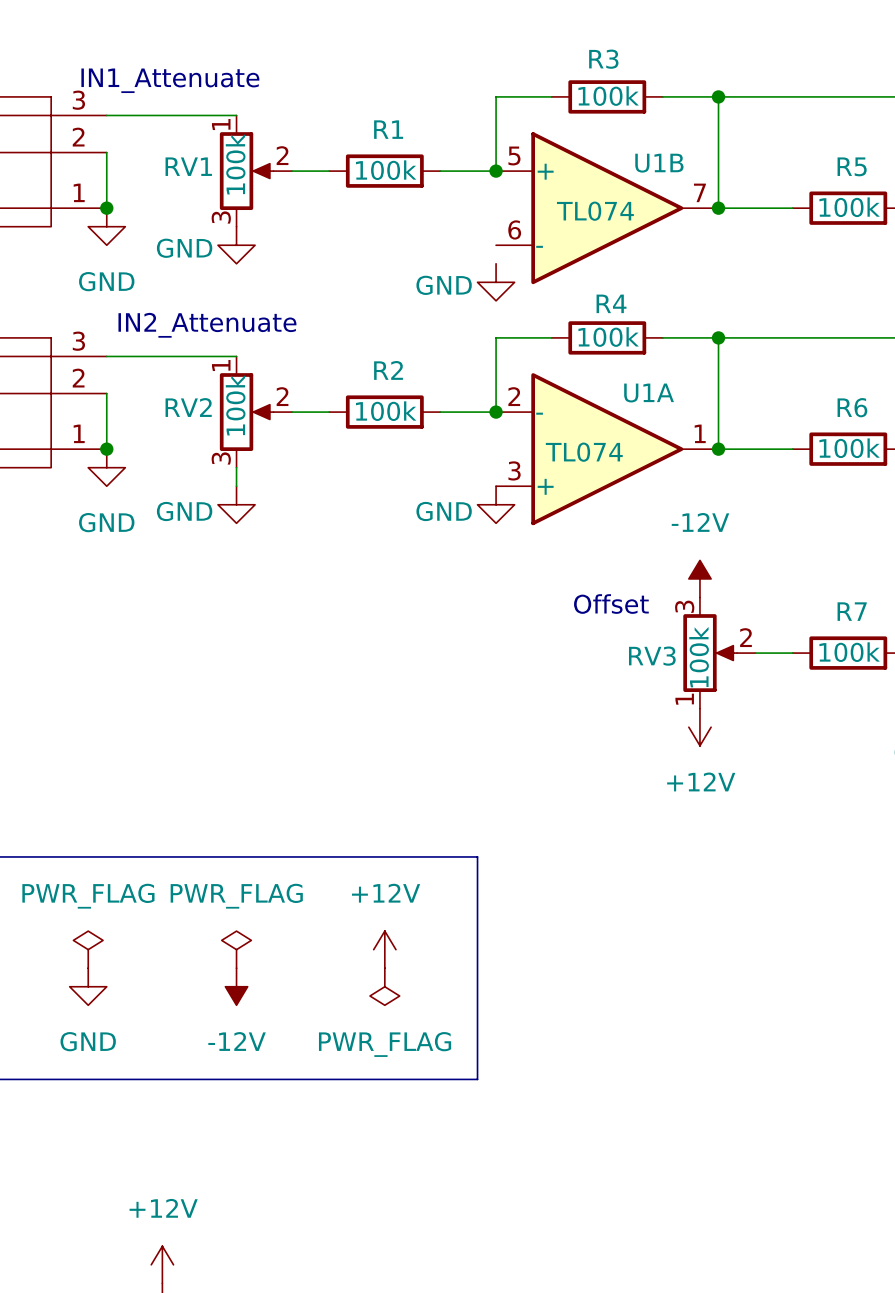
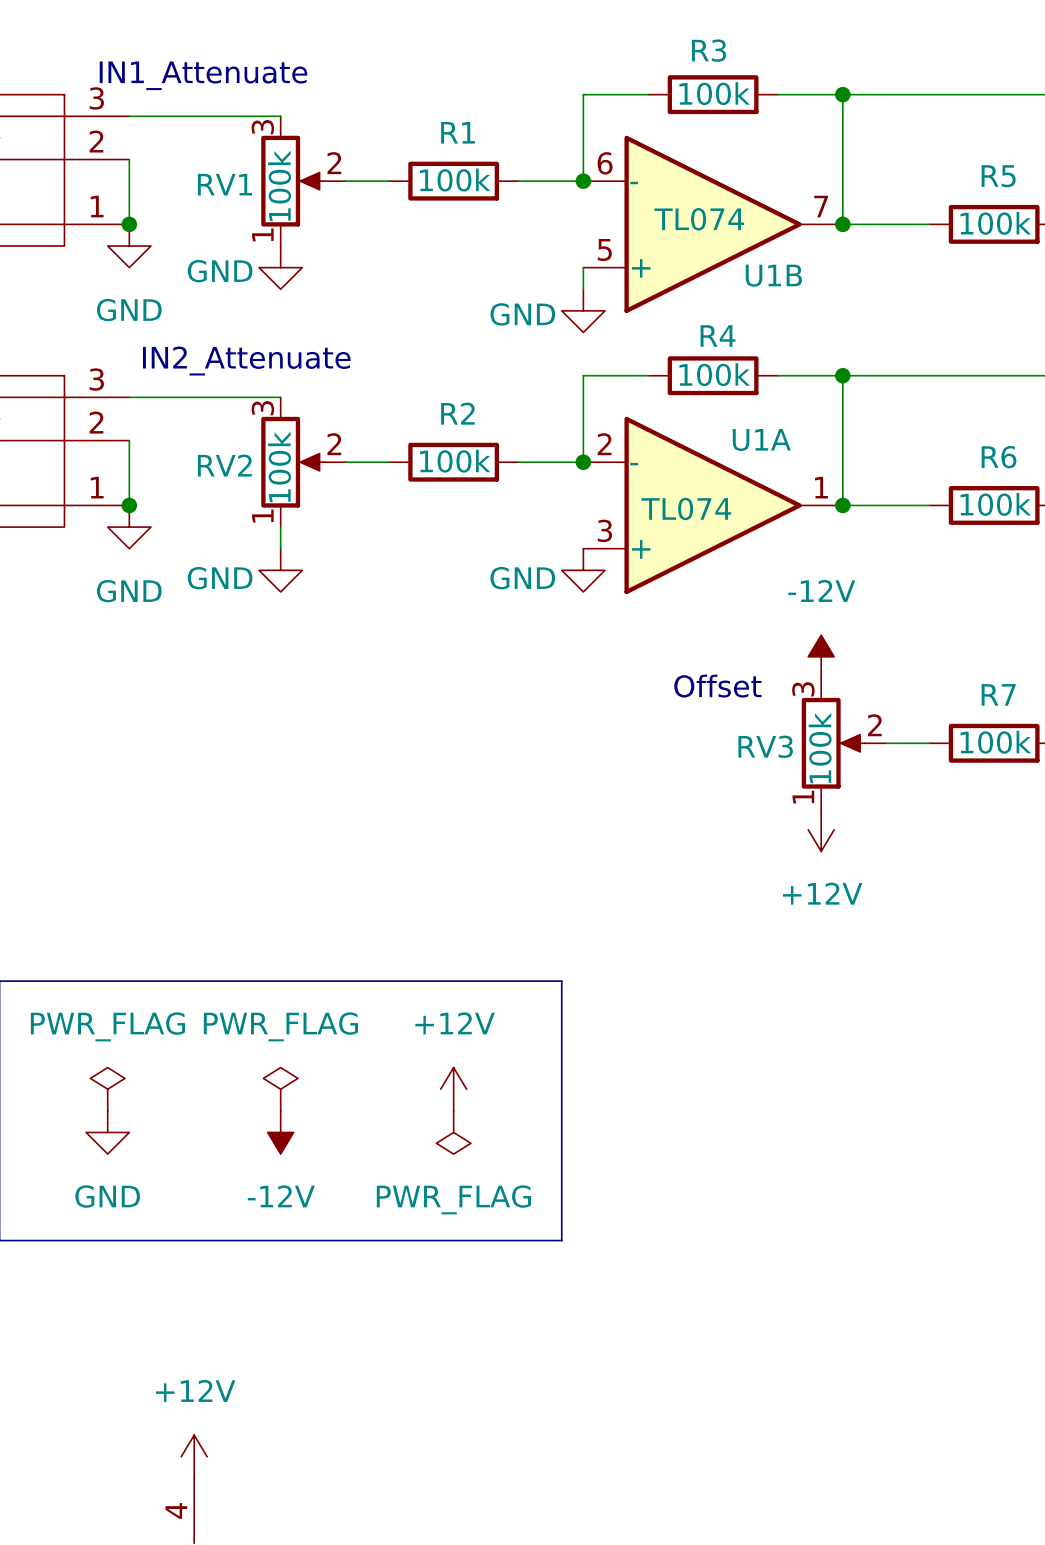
RV1 flip: as is (246, 171) -> up-down (292, 181)
U1B flip: as is (607, 208) -> up-down (713, 224)
wire: none -> (583, 267) (583, 289)
RV2 flip: as is (246, 412) -> up-down (292, 462)

